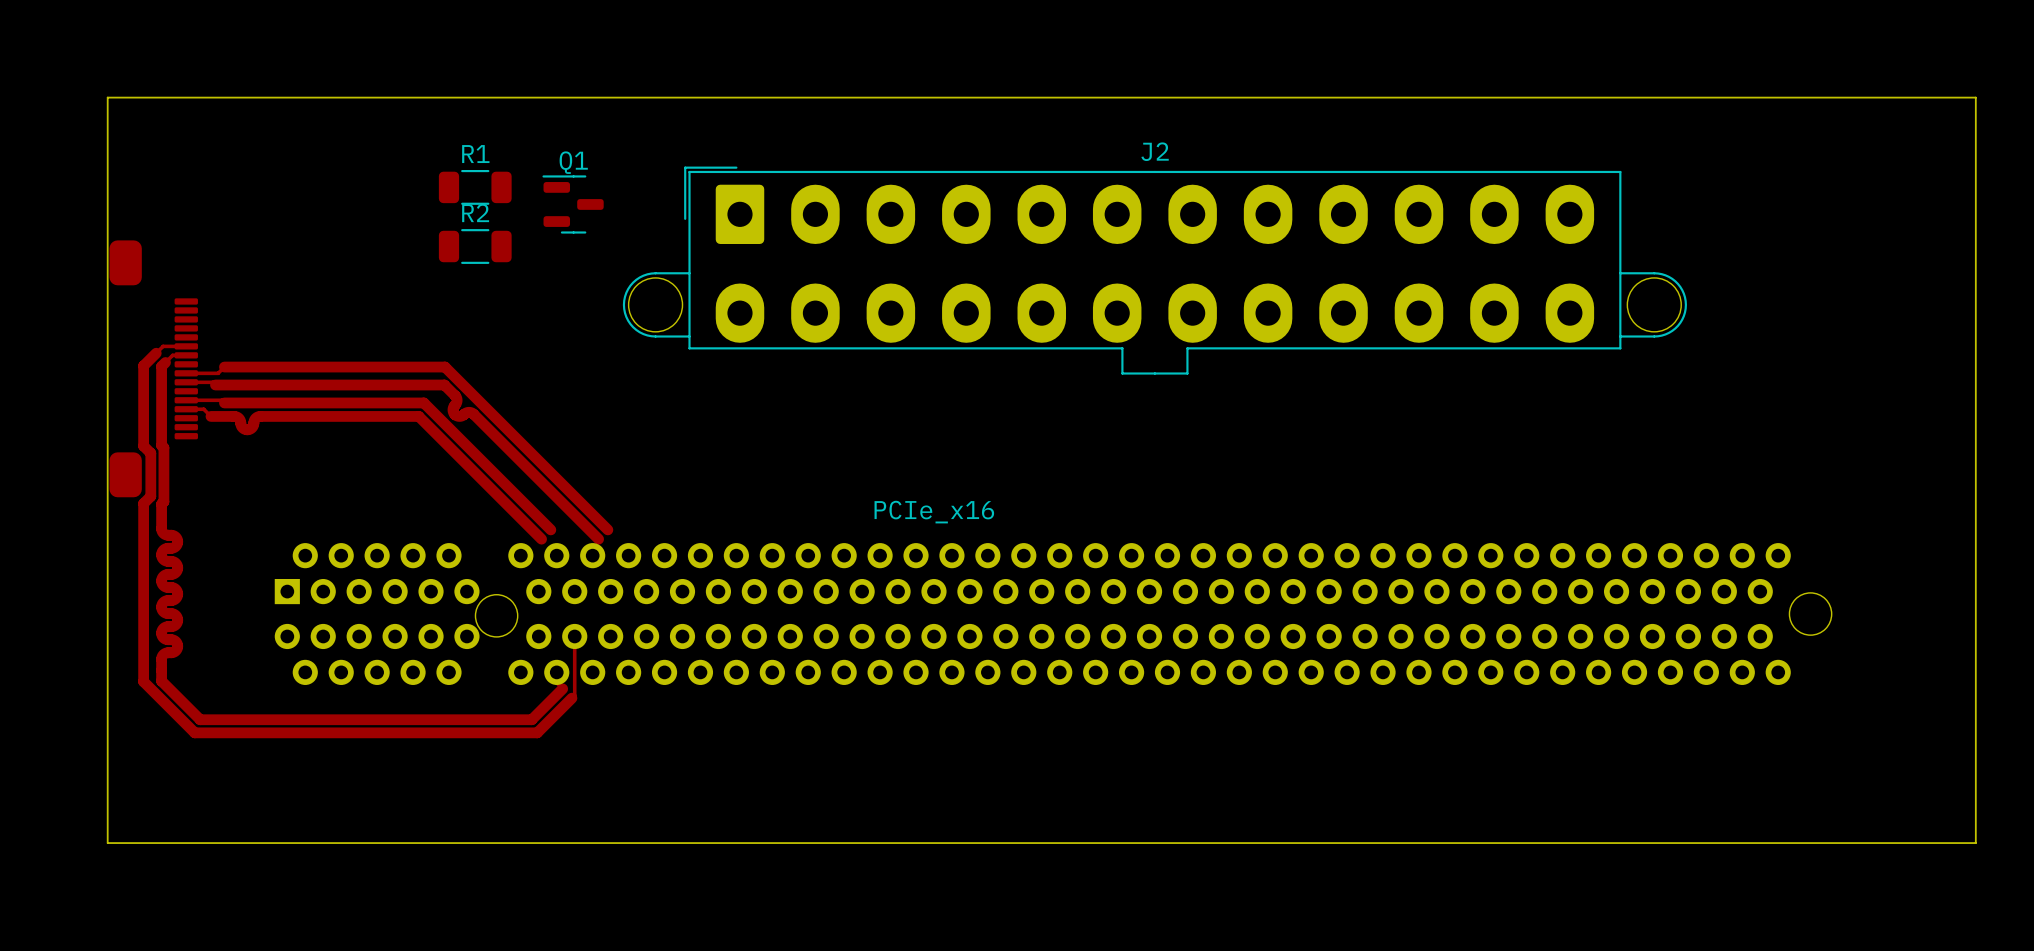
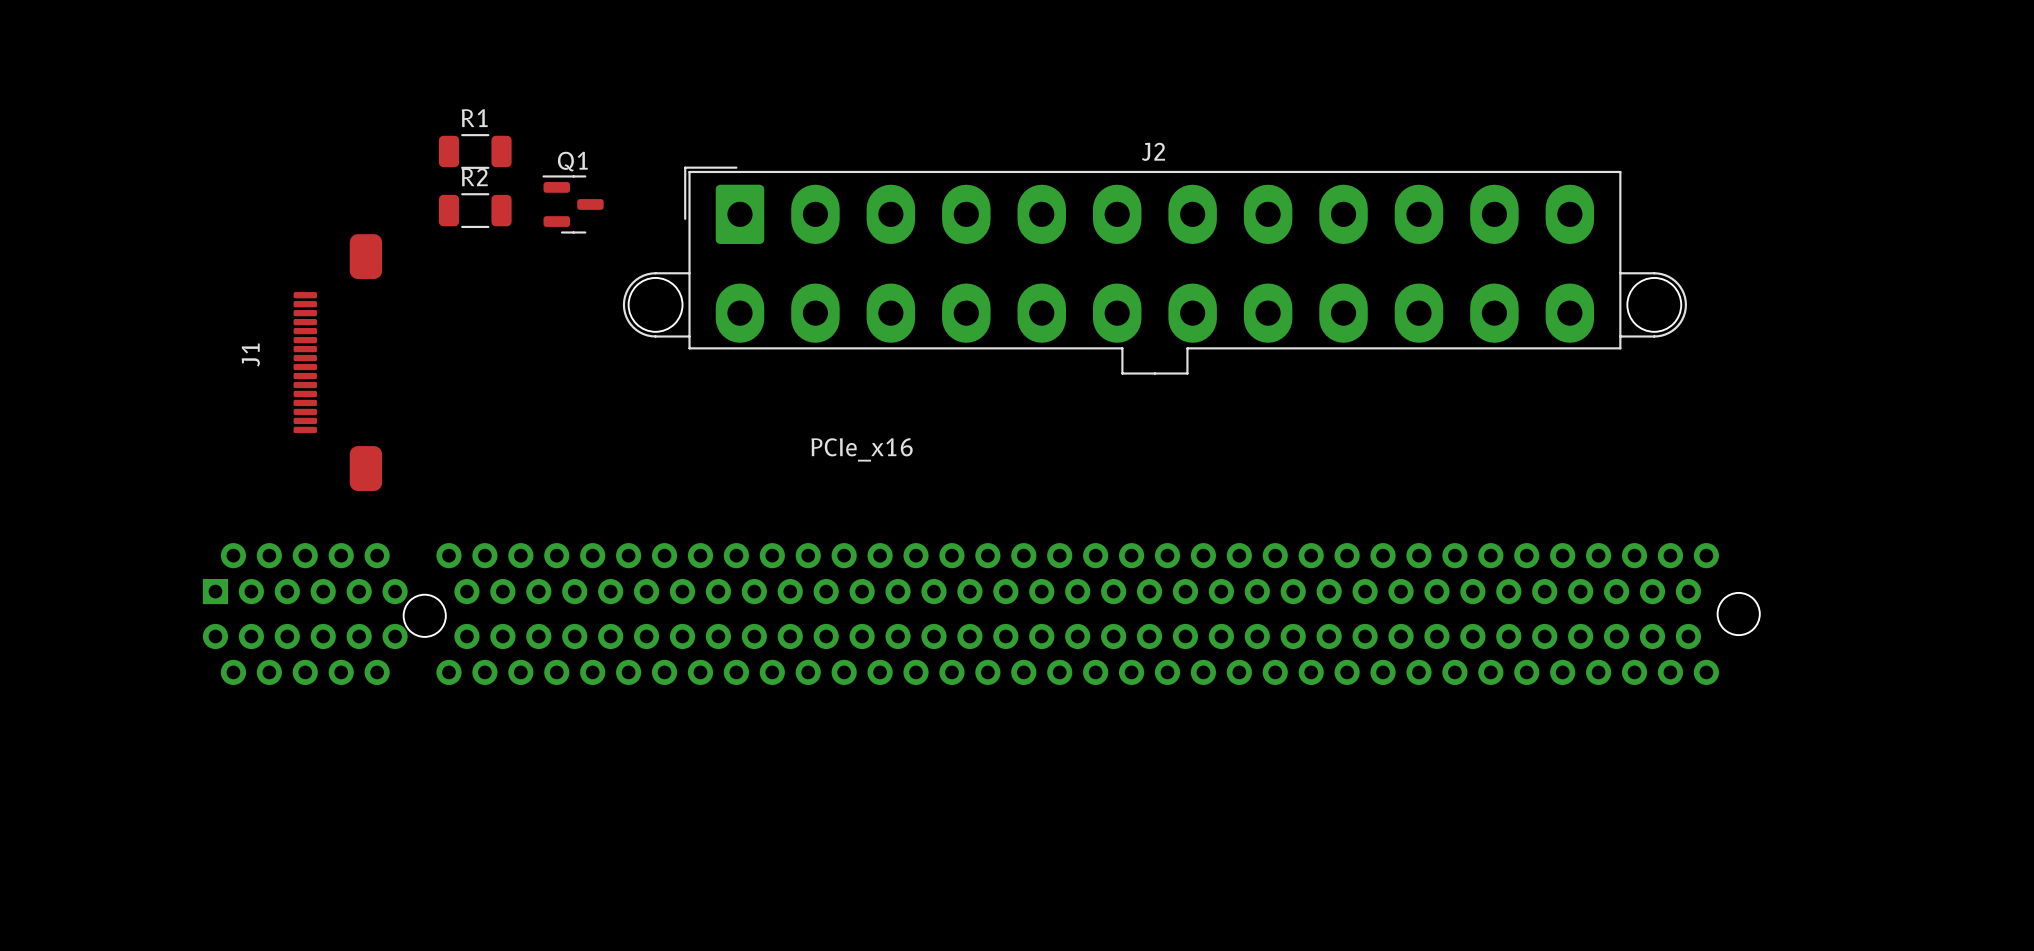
board edge: (107, 97) (1975, 97) (1975, 843) (107, 843) (107, 97) -> none
R1 position: (475, 187) -> (475, 151)
R2 position: (475, 246) -> (475, 210)
track: (186, 346) (163, 346) (143, 365) (143, 446) (150, 453) (150, 496) (143, 503) (143, 681) (194, 732) (537, 732) (574, 695) (574, 636) -> none
track: (186, 355) (172, 355) (161, 366) (161, 445) (163, 447) (163, 501) (161, 504) (161, 529) (164, 534) (175, 536) (177, 541) (175, 546) (165, 548) (161, 553) (163, 559) (174, 562) (177, 567) (174, 573) (163, 576) (162, 583) (165, 586) (175, 588) (177, 594) (175, 599) (164, 601) (161, 607) (164, 612) (174, 614) (177, 620) (175, 625) (165, 627) (161, 631) (163, 637) (174, 640) (177, 646) (175, 651) (165, 653) (162, 656) (161, 681) (200, 719) (531, 719) (562, 688) (556, 682) (556, 672) (552, 677) -> none
J1: none -> (337, 362)
part: (153, 368) -> none
track: (186, 373) (218, 373) (224, 367) (445, 367) (607, 529) -> none
track: (186, 382) (212, 382) (215, 385) (444, 385) (456, 398) (453, 409) (454, 414) (459, 416) (467, 412) (473, 413) (598, 539) -> none
track: (186, 400) (221, 400) (224, 402) (423, 402) (550, 529) -> none
track: (186, 409) (203, 409) (210, 416) (235, 416) (240, 422) -> none
track: (253, 422) (255, 418) (260, 416) (418, 416) (541, 539) -> none
track: (240, 423) (242, 427) (247, 429) (251, 427) (253, 423) -> none
PCIe_x16 name position: PCIe_x16 (934, 512) -> PCIe_x16 (862, 449)
PCIe_x16 position: (1053, 614) -> (981, 614)

